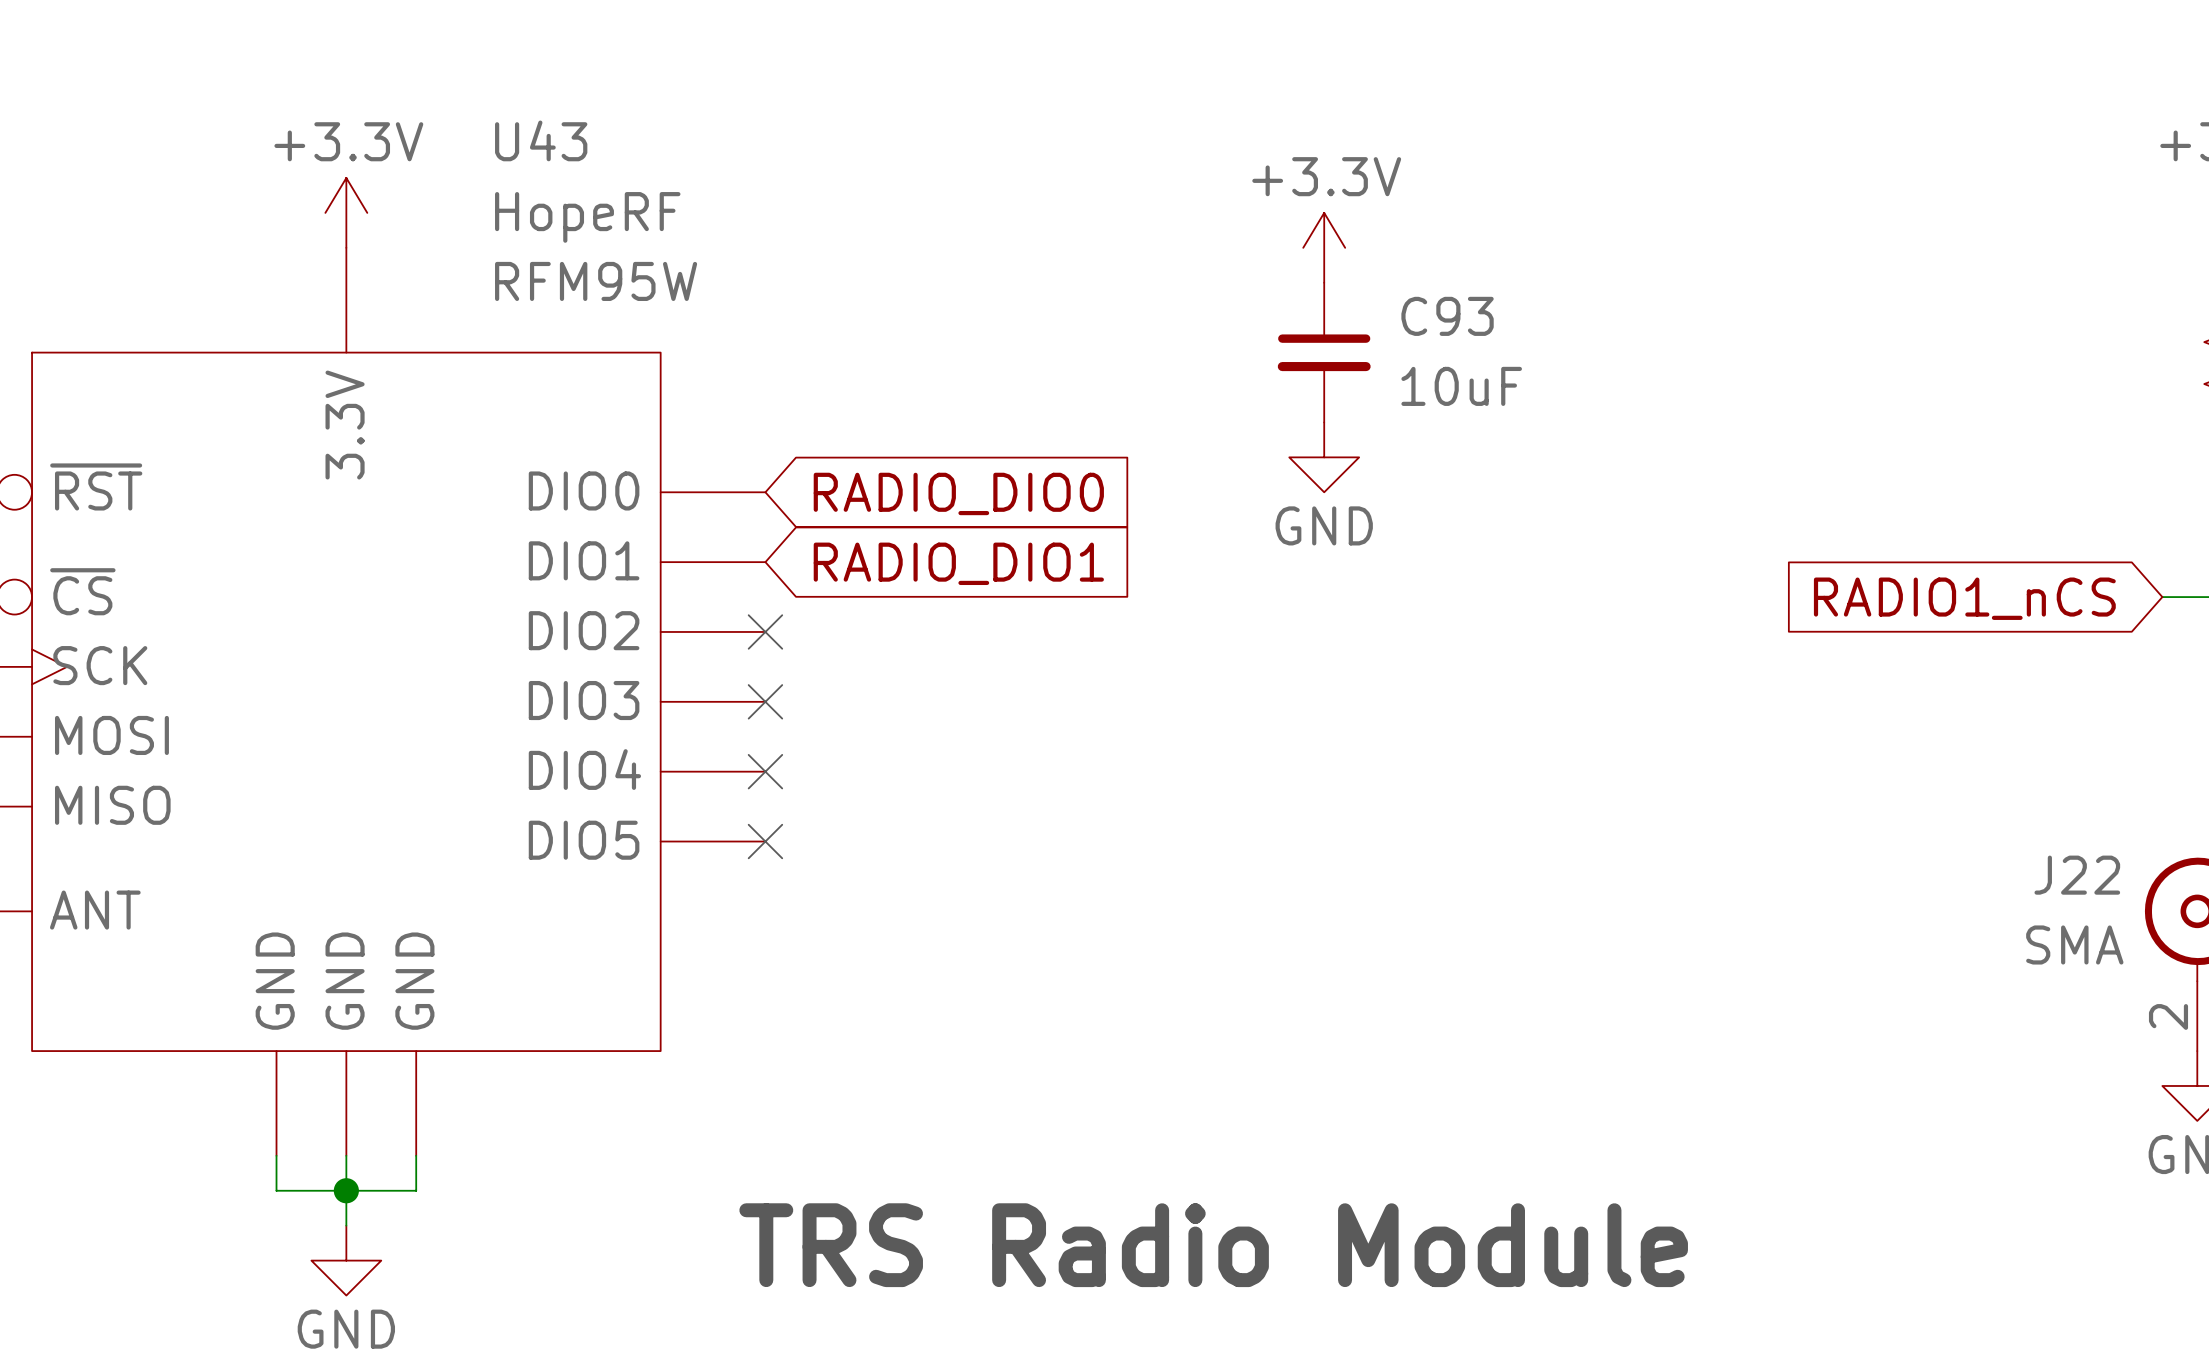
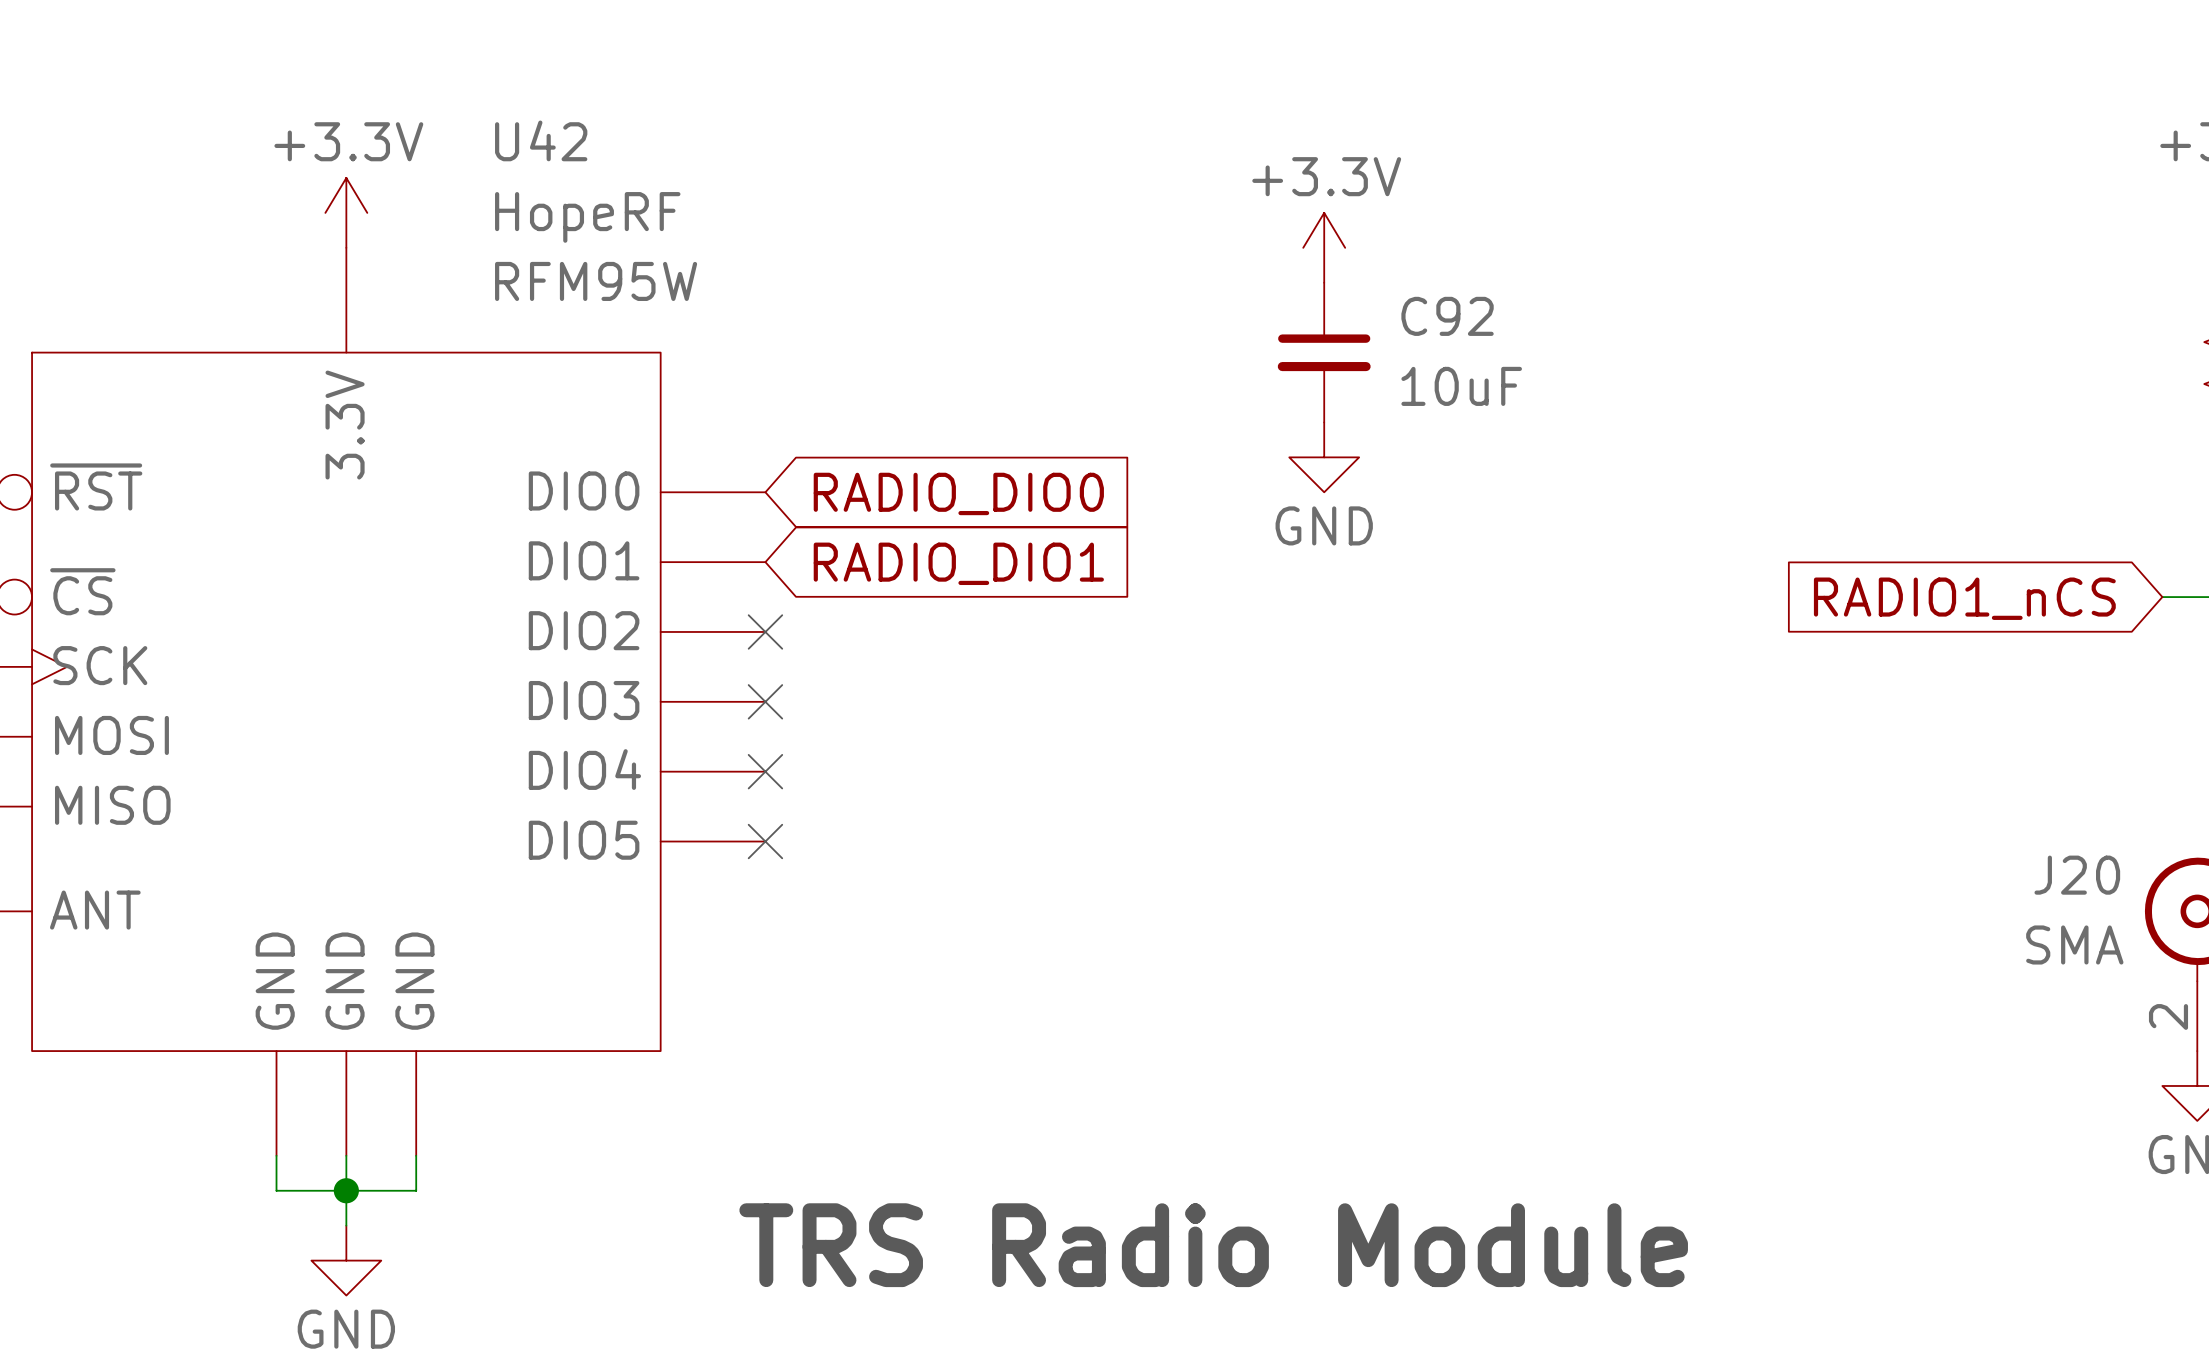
U43 name: U43 (541, 140) -> U42 (541, 140)
C93 name: C93 (1447, 316) -> C92 (1447, 316)
J22 name: J22 (2077, 875) -> J20 (2077, 875)

